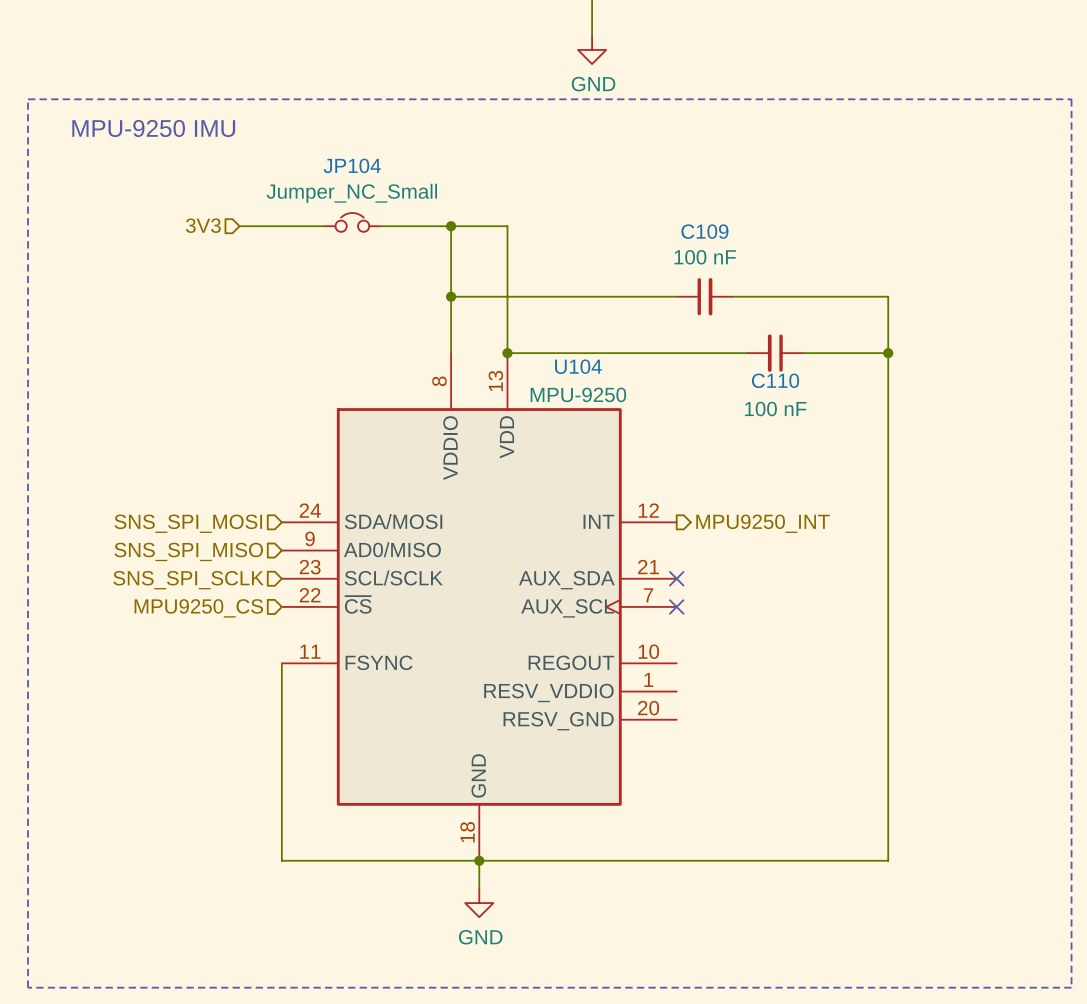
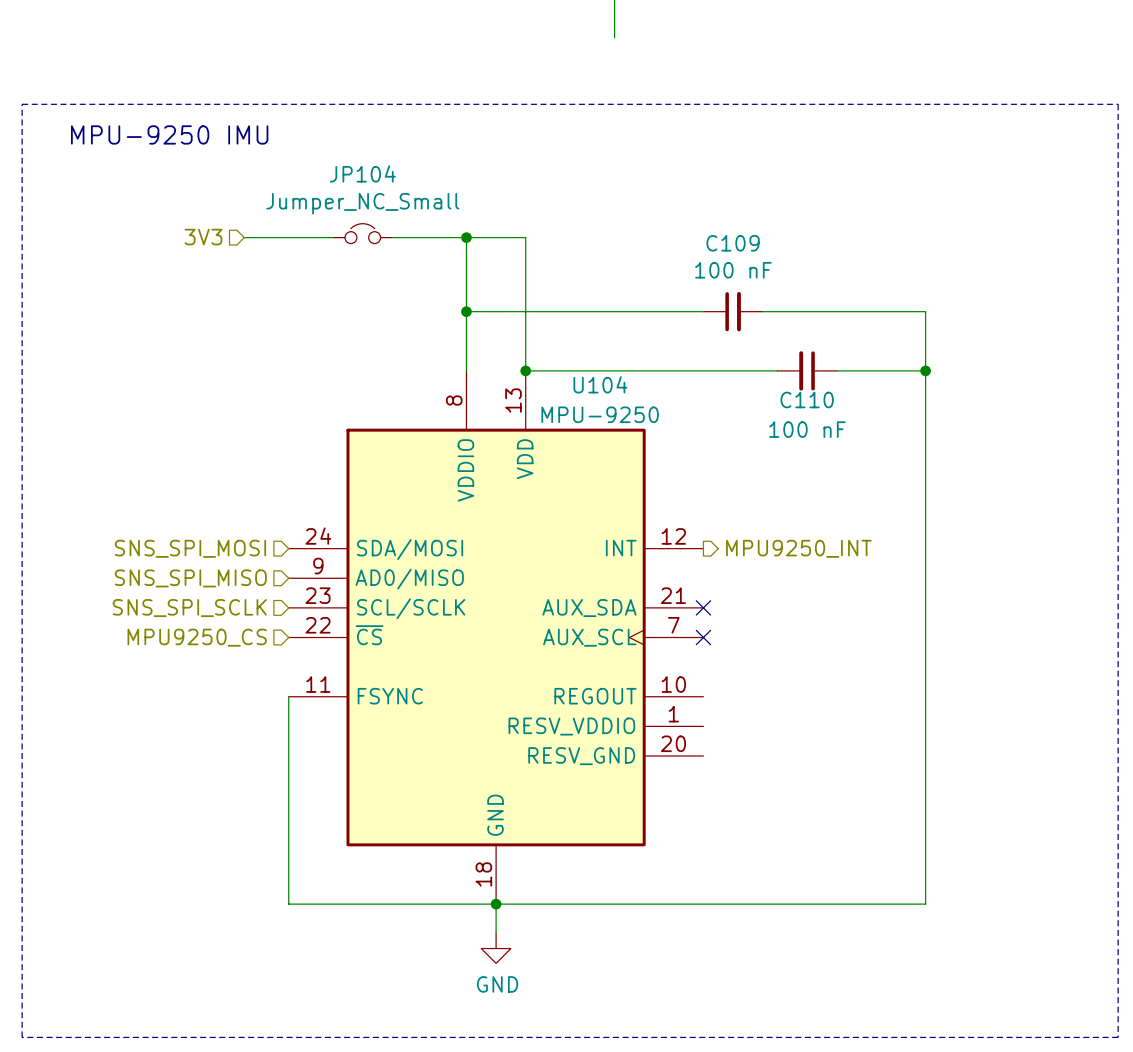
power symbol: GND (592, 49) -> none

